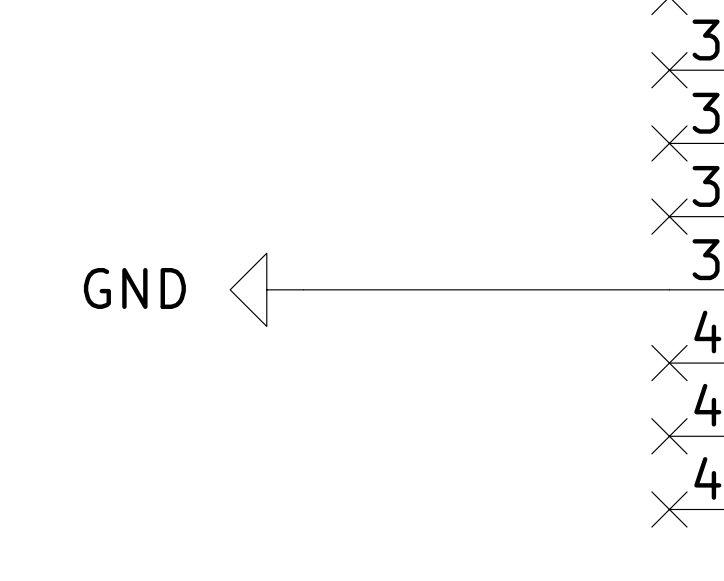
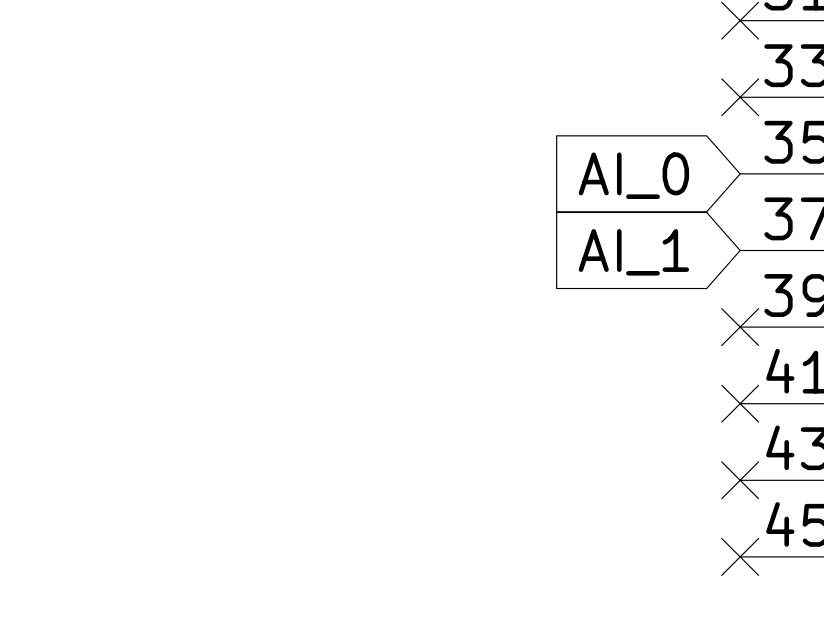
no-connect mark: (669, 143) -> none
global label: none -> AI_0 (633, 175)
no-connect mark: (669, 216) -> none
global label: none -> AI_1 (633, 252)
power symbol: GND (266, 289) -> none
wire: (303, 289) (669, 289) -> none
no-connect mark: none -> (740, 327)

